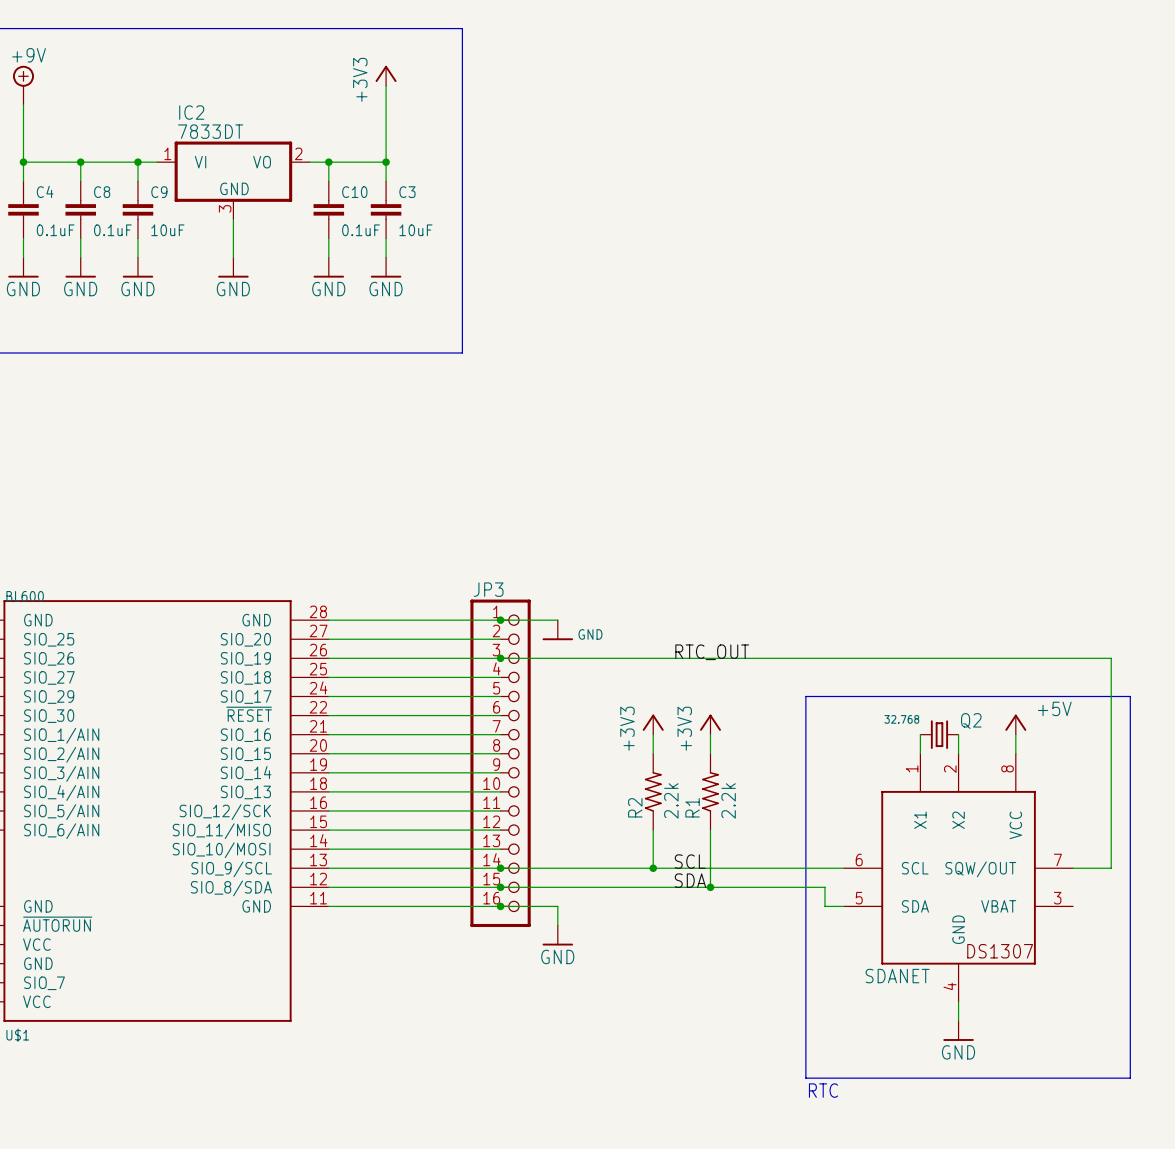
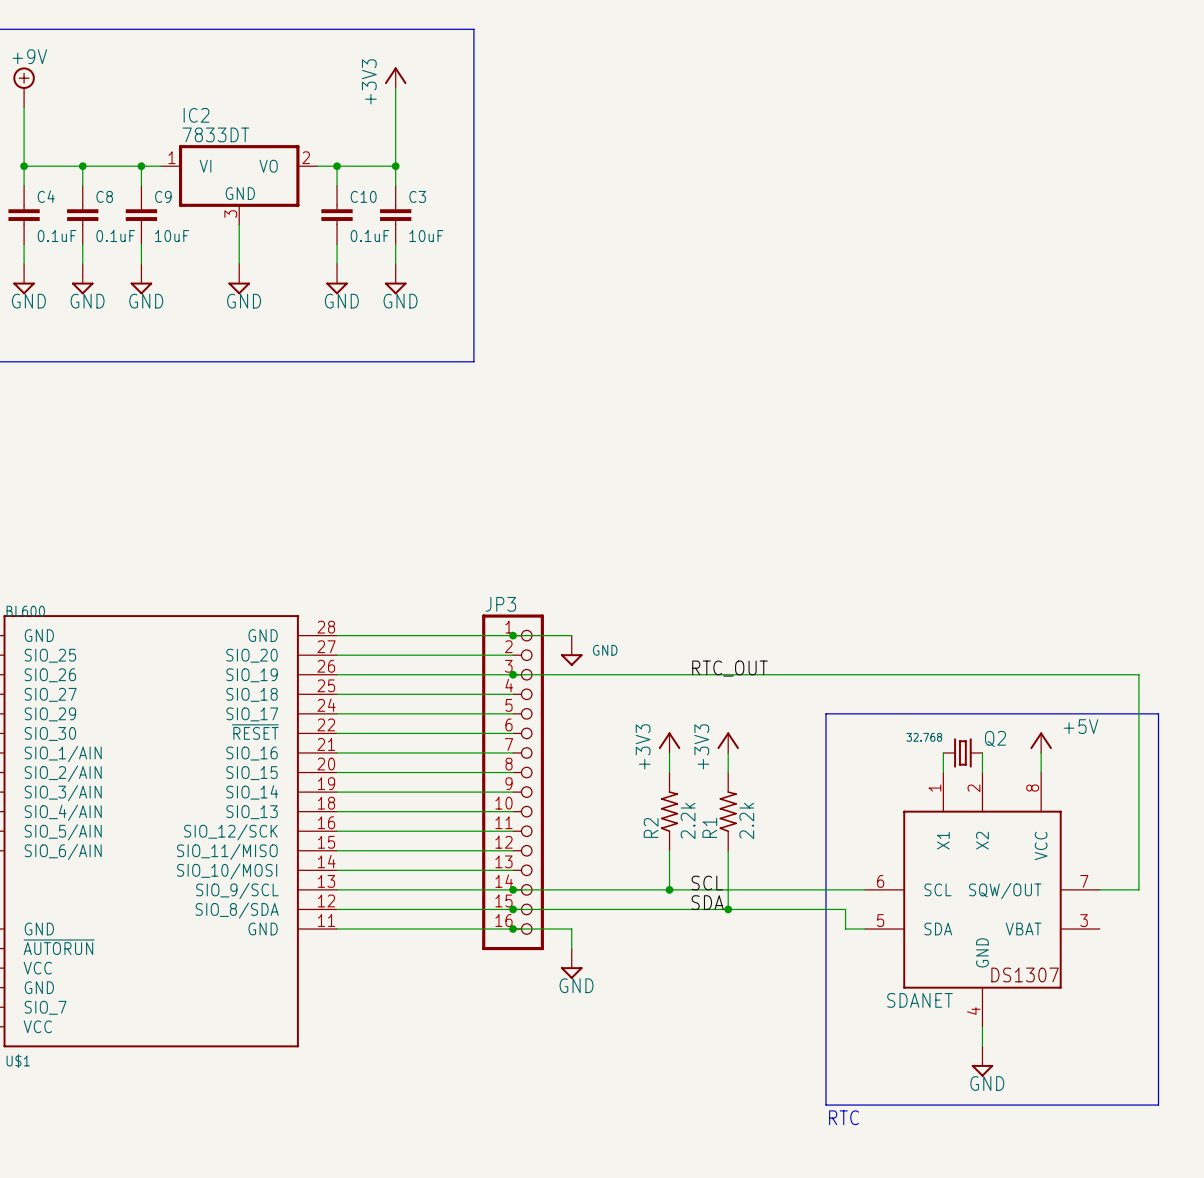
power symbol shape: [8, 257, 39, 278] -> [13, 264, 35, 295]
power symbol shape: [65, 257, 97, 278] -> [71, 264, 94, 295]
power symbol shape: [122, 257, 154, 278] -> [130, 264, 153, 295]
power symbol shape: [218, 257, 249, 278] -> [228, 264, 250, 295]
power symbol shape: [313, 257, 345, 278] -> [326, 264, 348, 295]
power symbol shape: [370, 257, 402, 278] -> [384, 264, 407, 295]
power symbol shape: [542, 620, 574, 641] -> [560, 635, 583, 666]
power symbol shape: [542, 925, 574, 946] -> [560, 948, 583, 979]
power symbol shape: [943, 1020, 974, 1041] -> [971, 1046, 994, 1077]

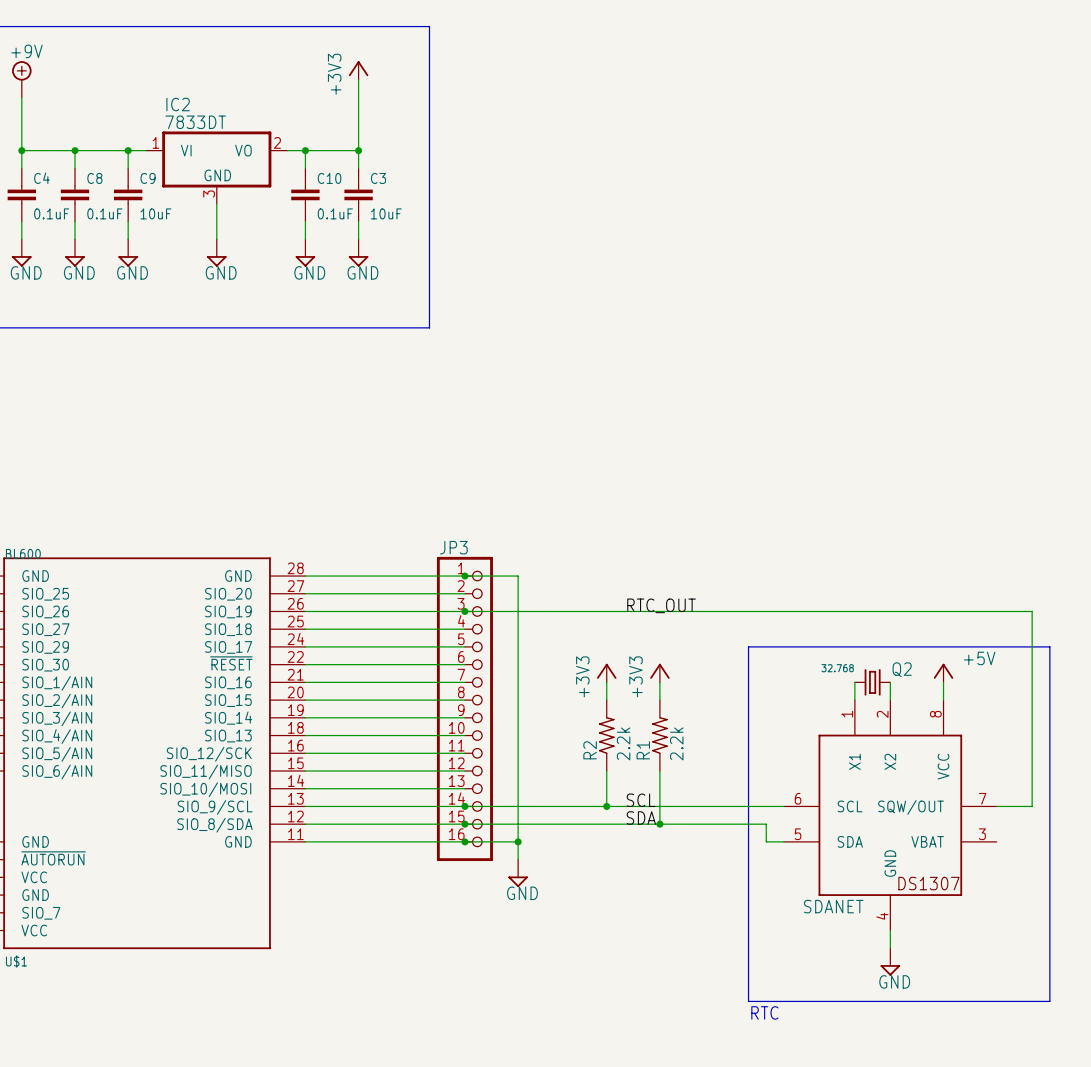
wire: none -> (518, 576) (518, 841)
power symbol: GND (571, 650) -> none
junction: none -> (518, 841)

